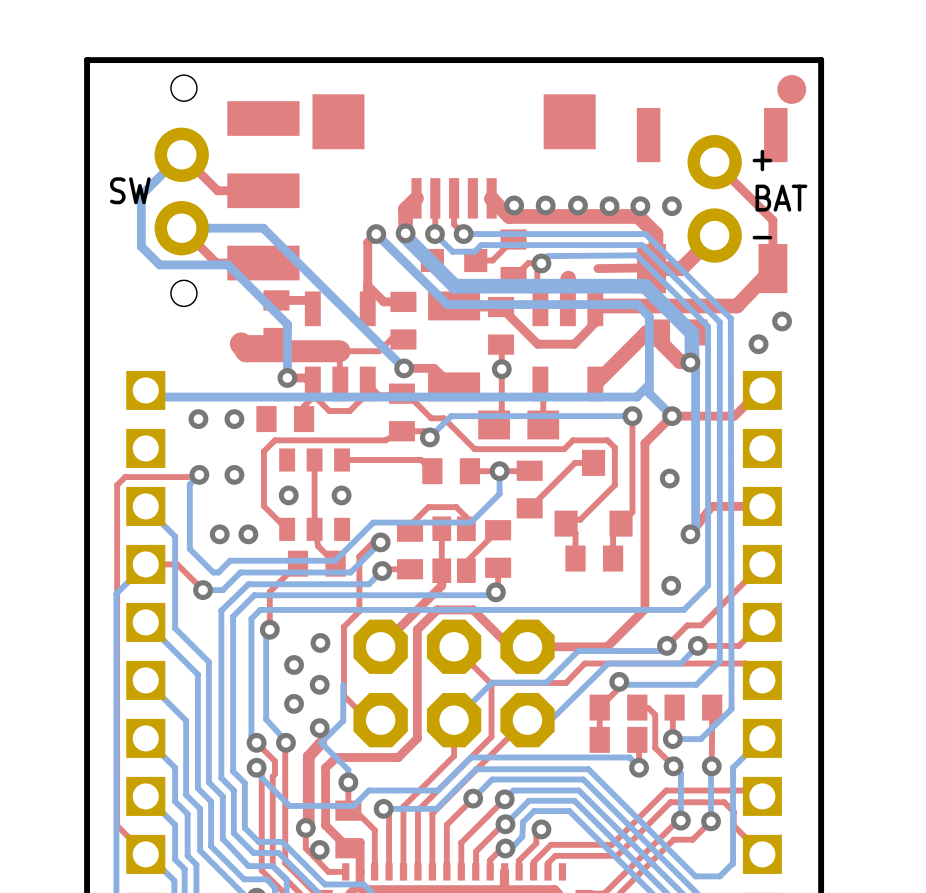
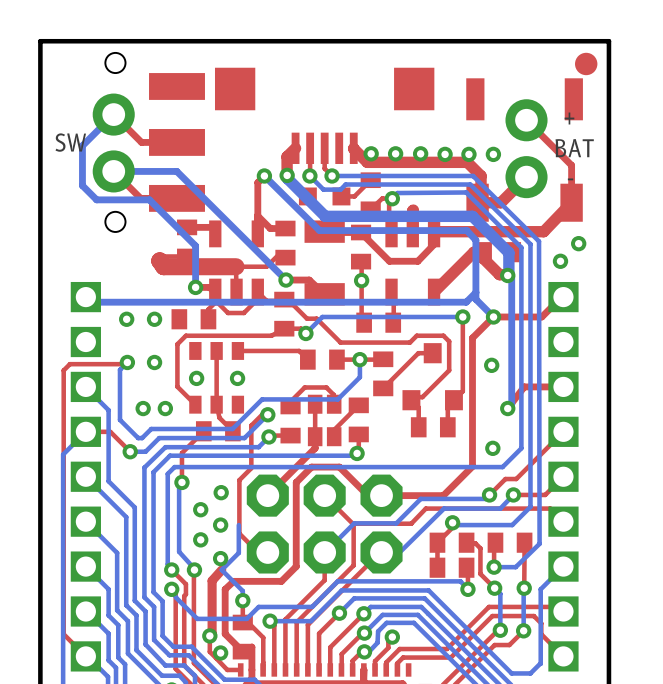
top track: (650, 267) (597, 268) -> none
part footprint: [478, 410, 560, 440] -> [356, 312, 402, 333]

